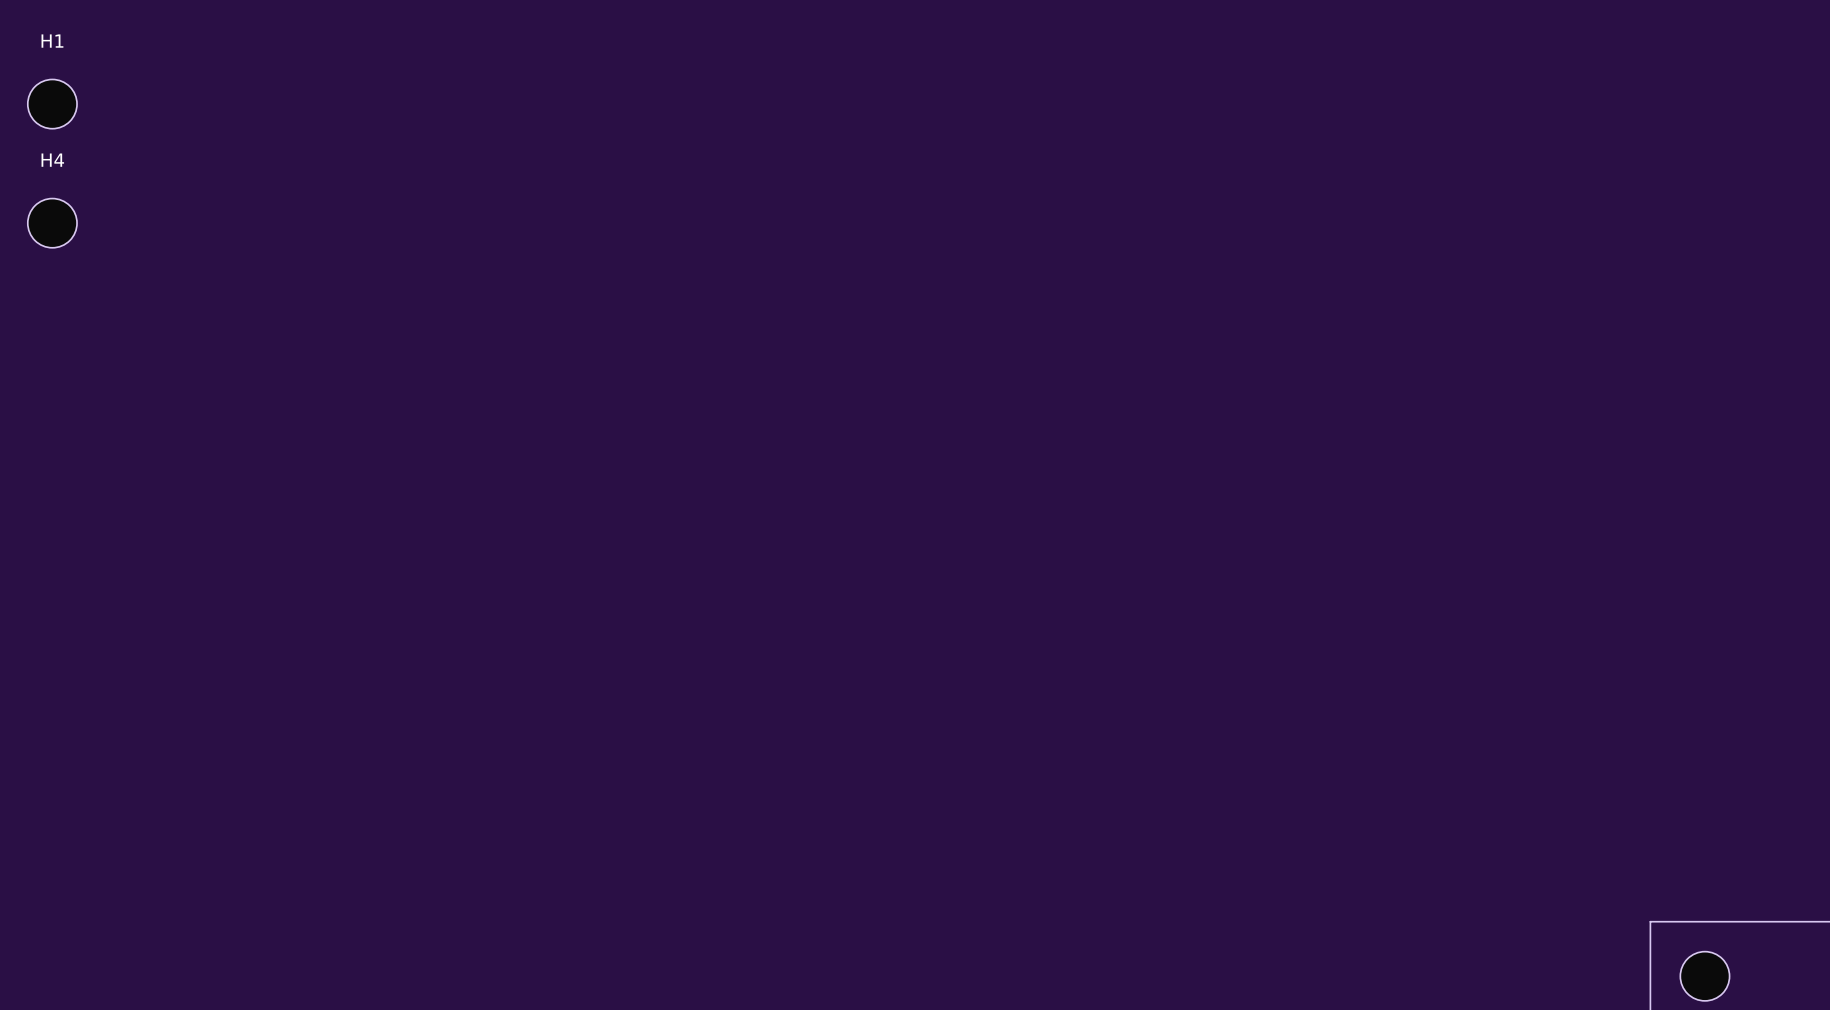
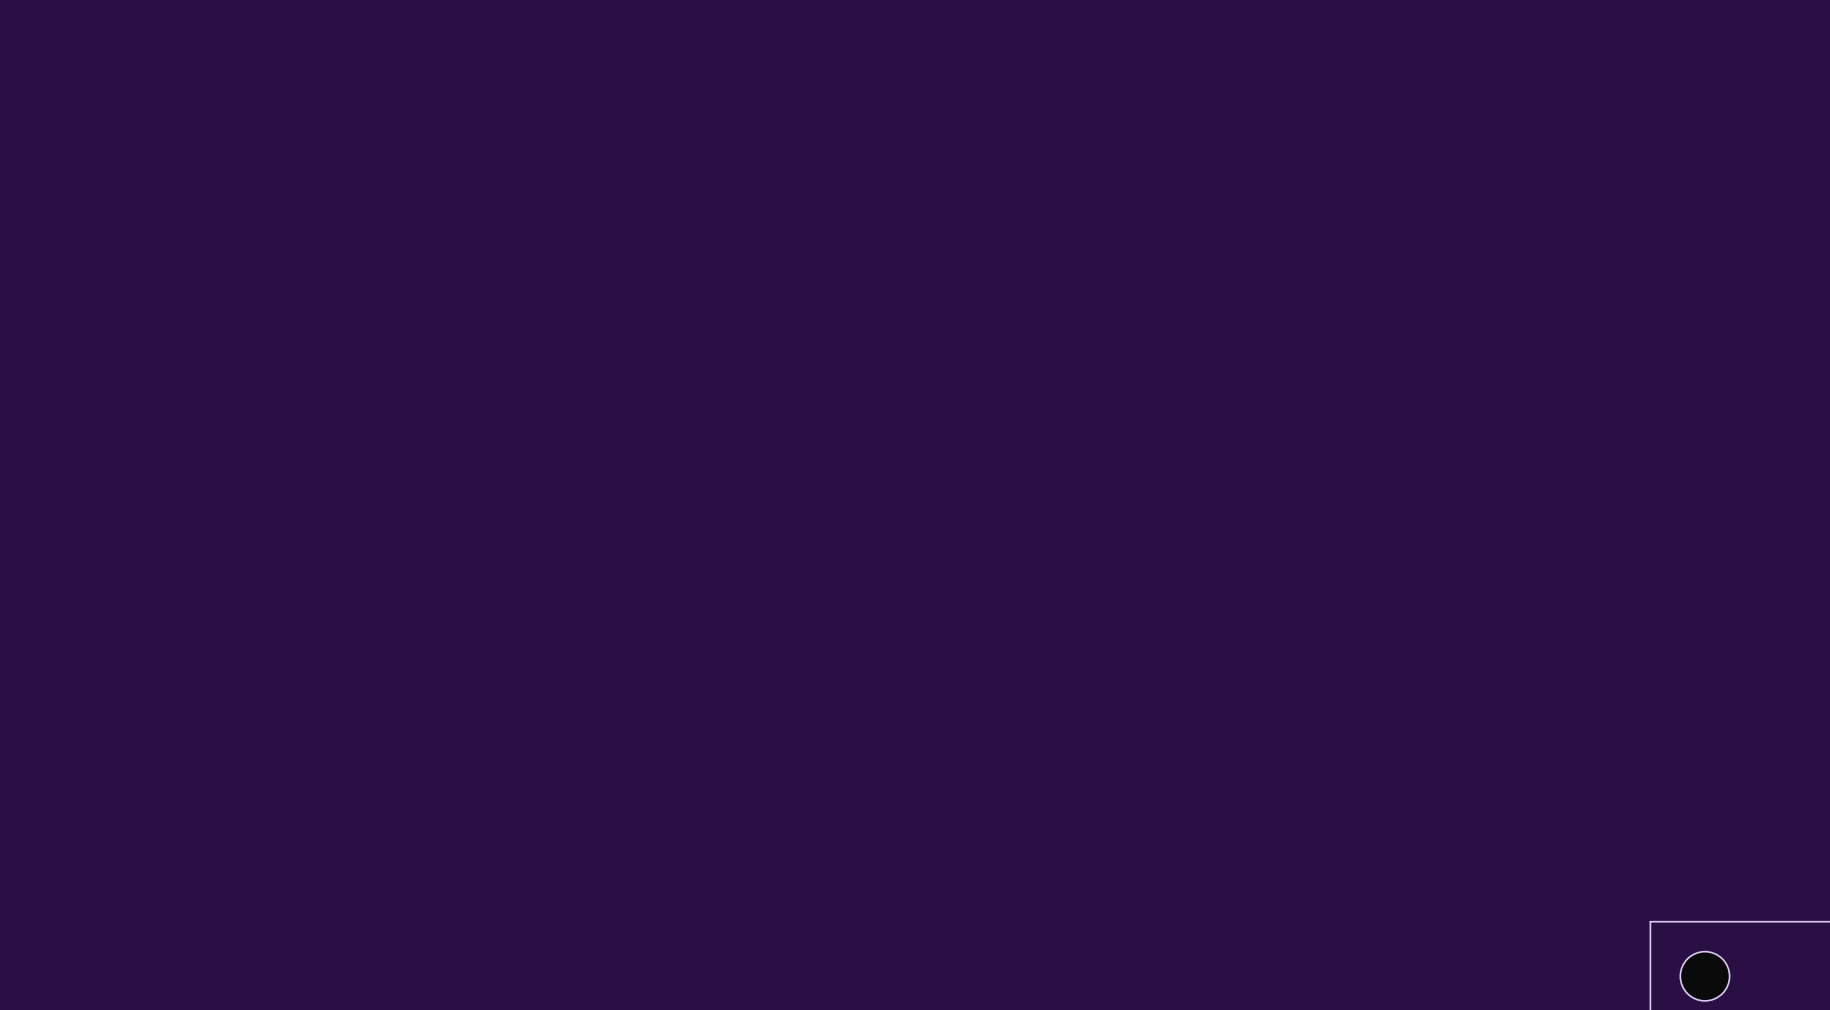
H1: (52, 104) -> none
H4: (52, 223) -> none

